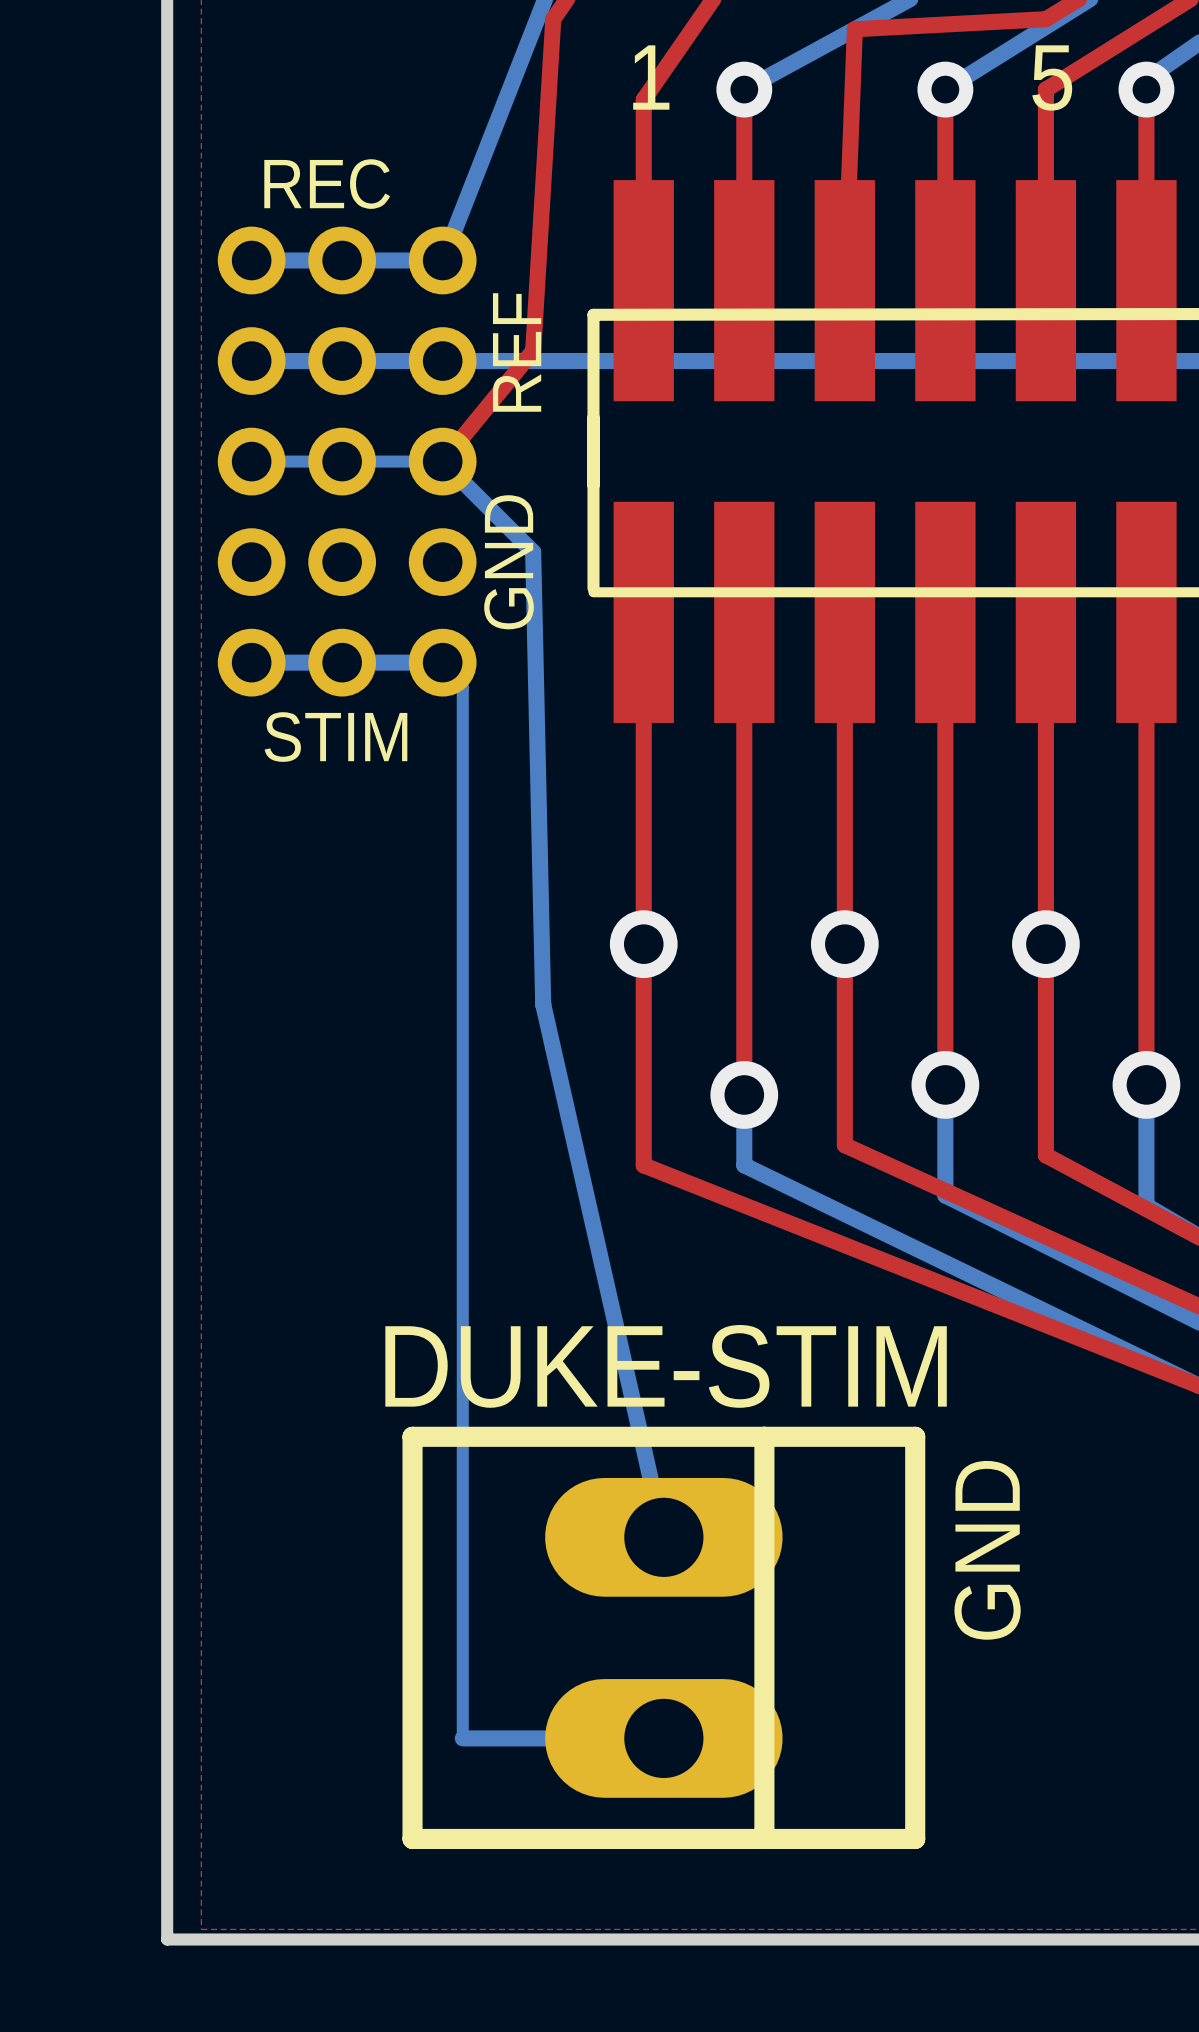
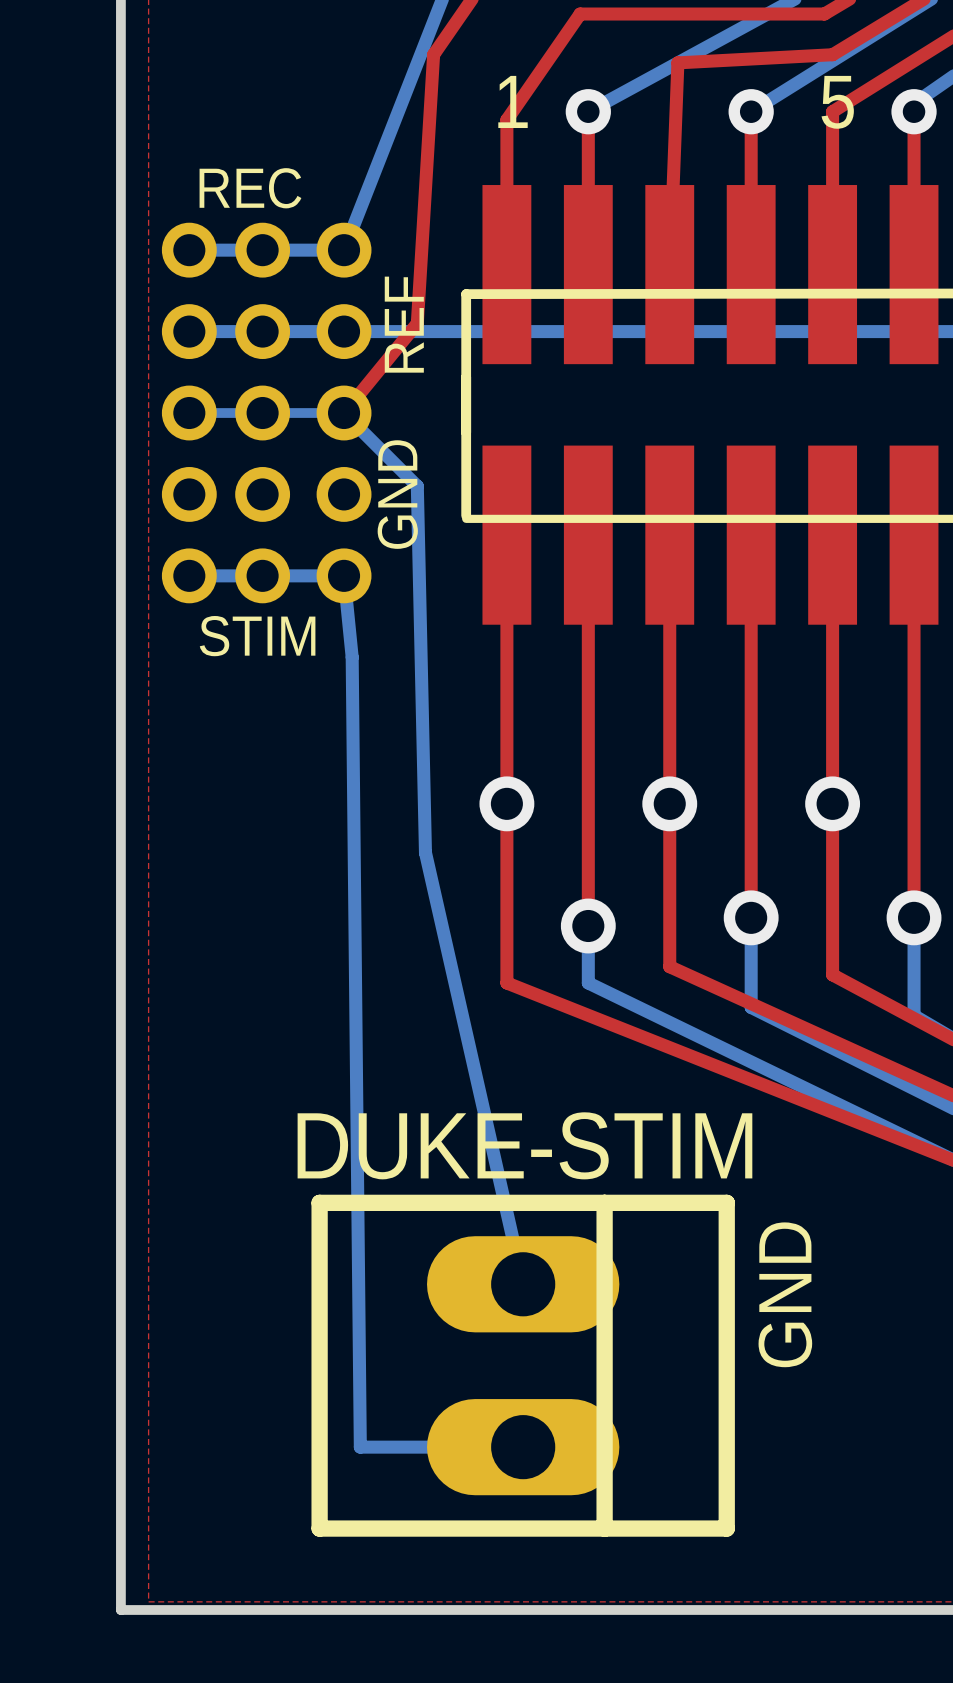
bottom track: (437, 662) (462, 687) (462, 1738) -> (344, 575) (352, 657) (360, 1447)

